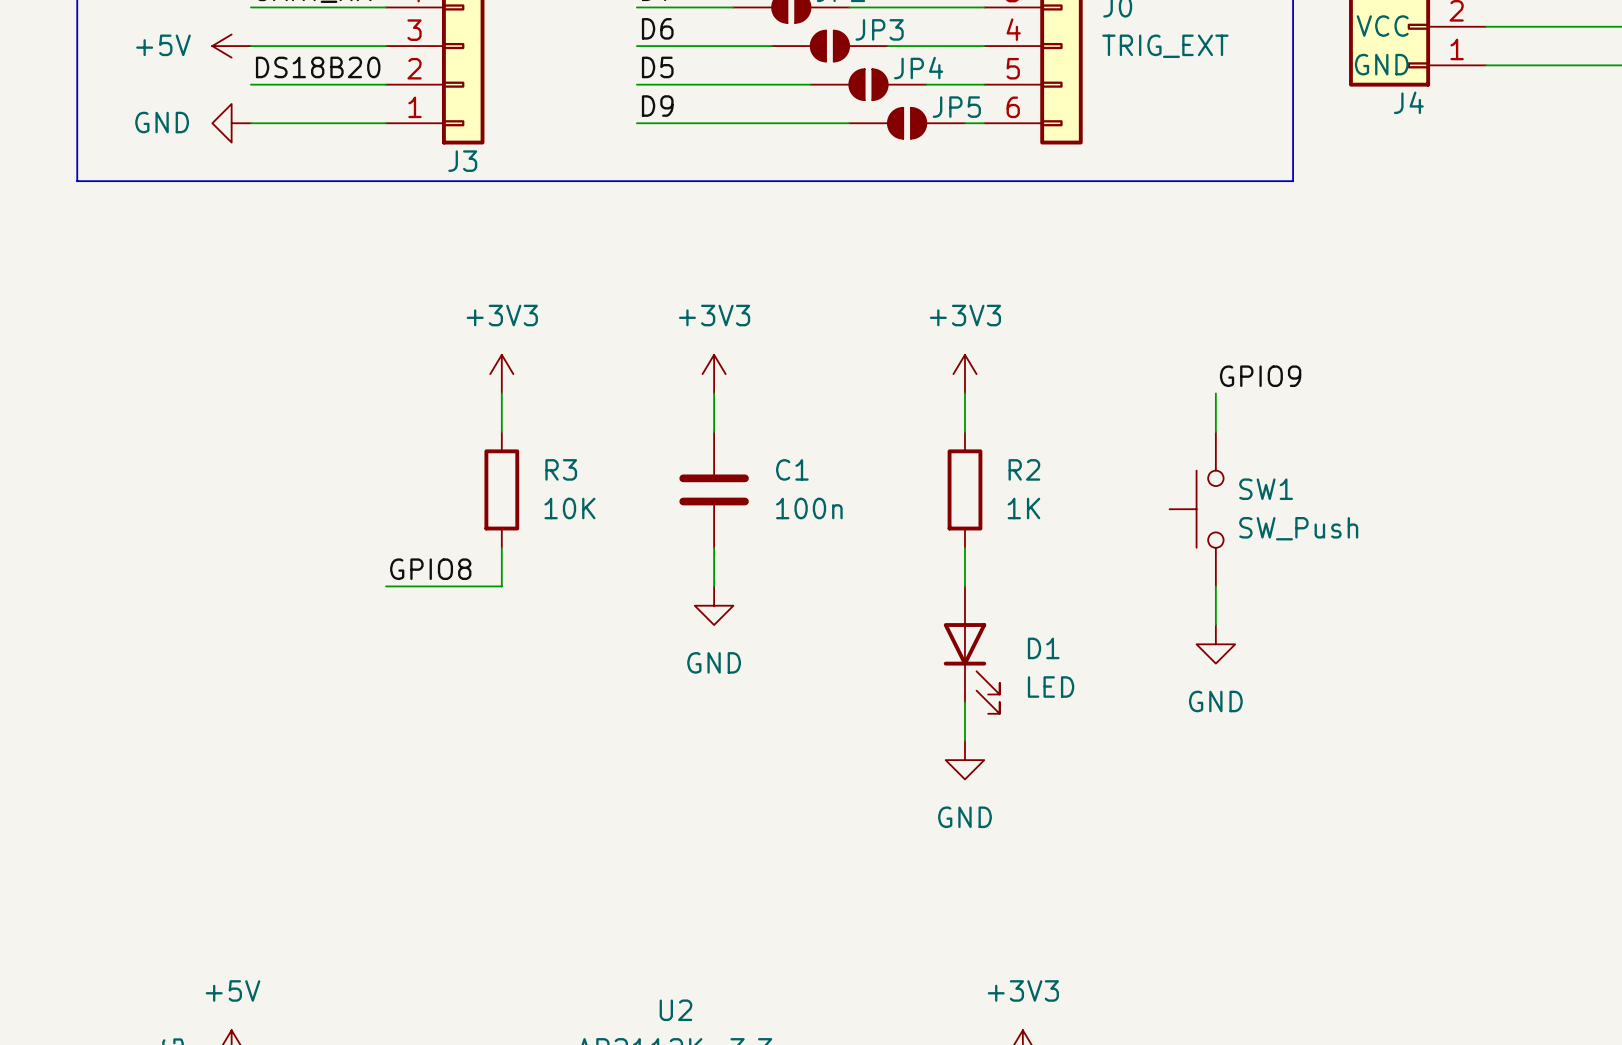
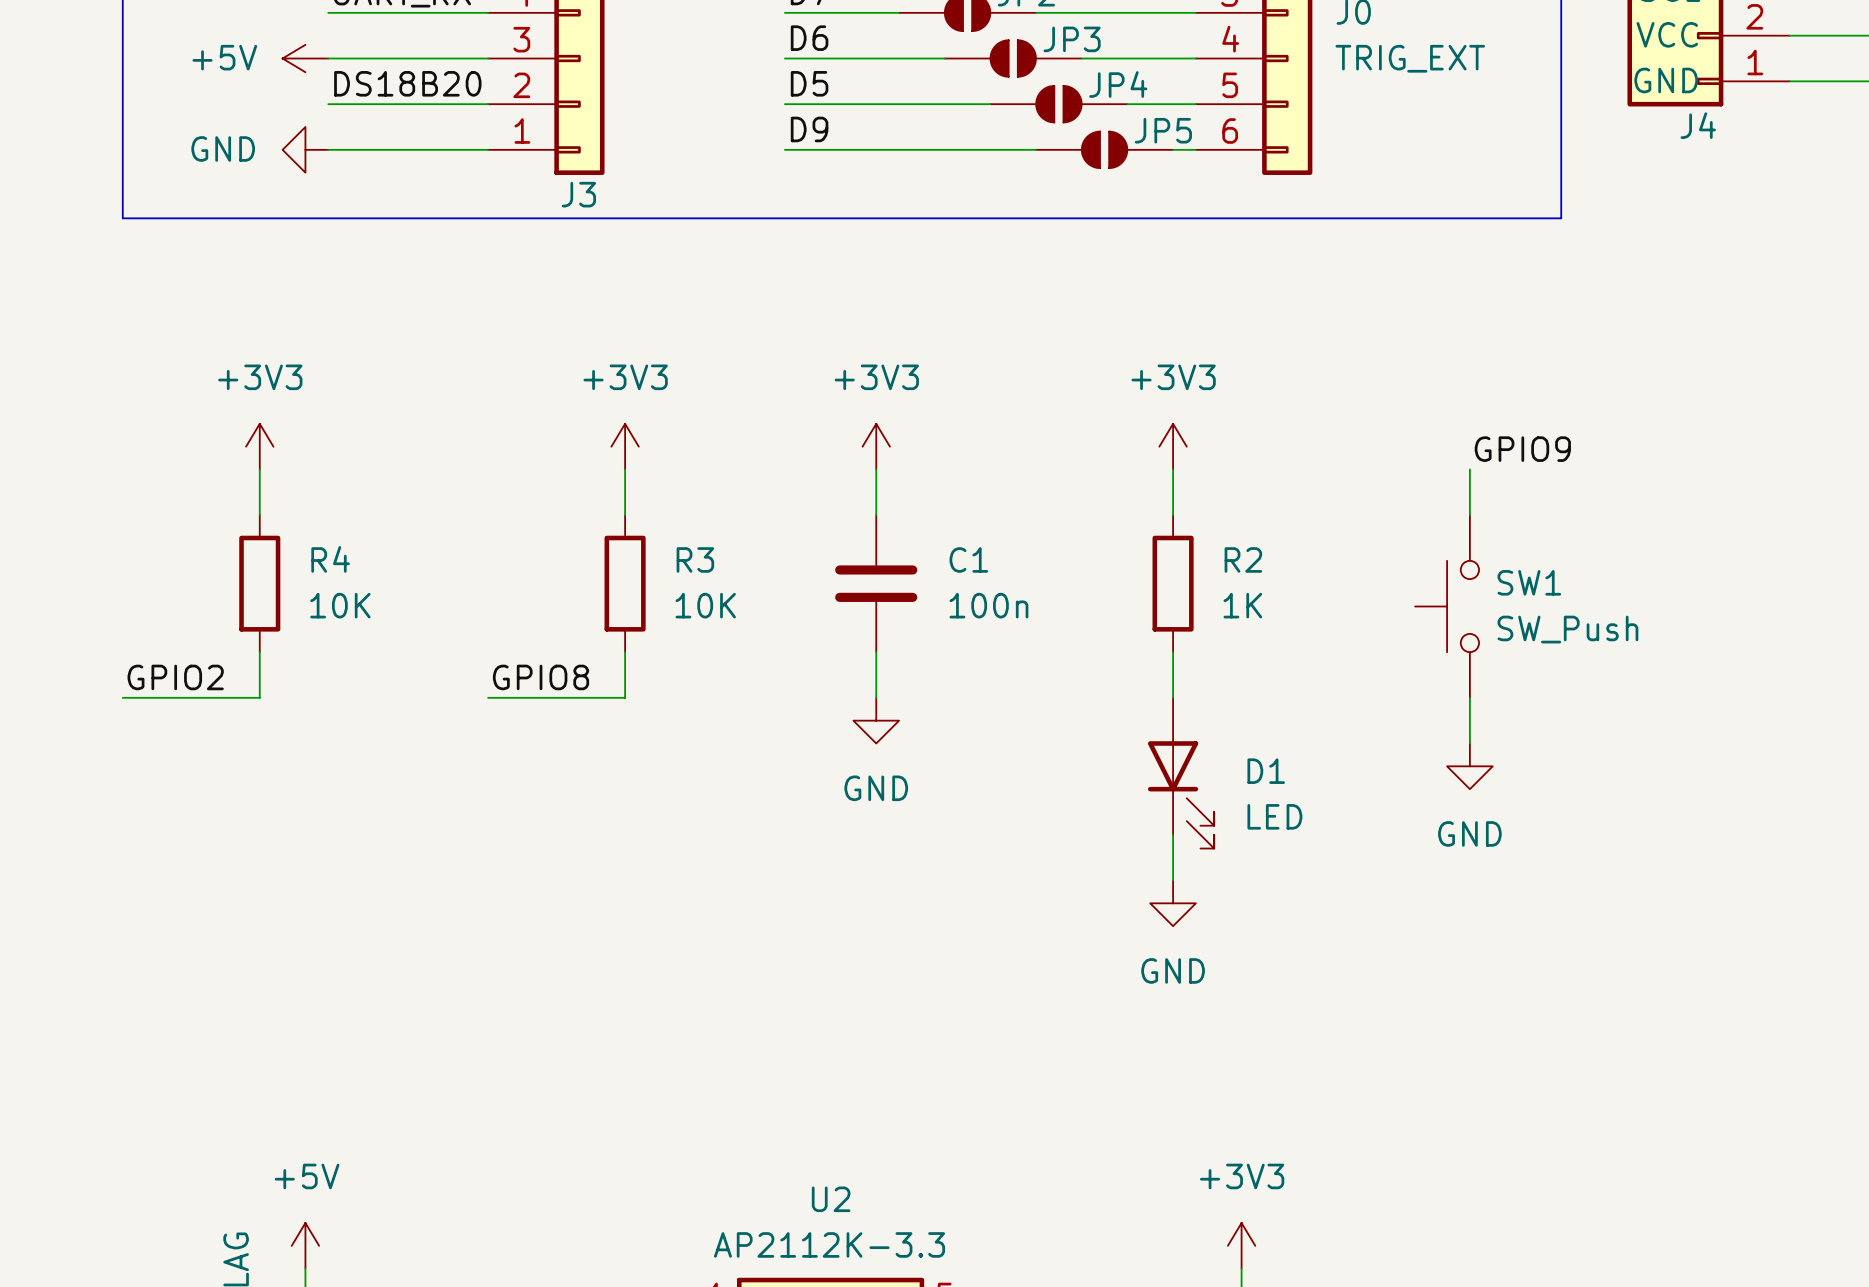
power symbol: none -> +3V3 (259, 446)
wire: none -> (259, 469) (259, 515)
R4: none -> 10K (259, 583)
wire: none -> (259, 652) (259, 697) (122, 697)
label: none -> GPIO2 (175, 677)

